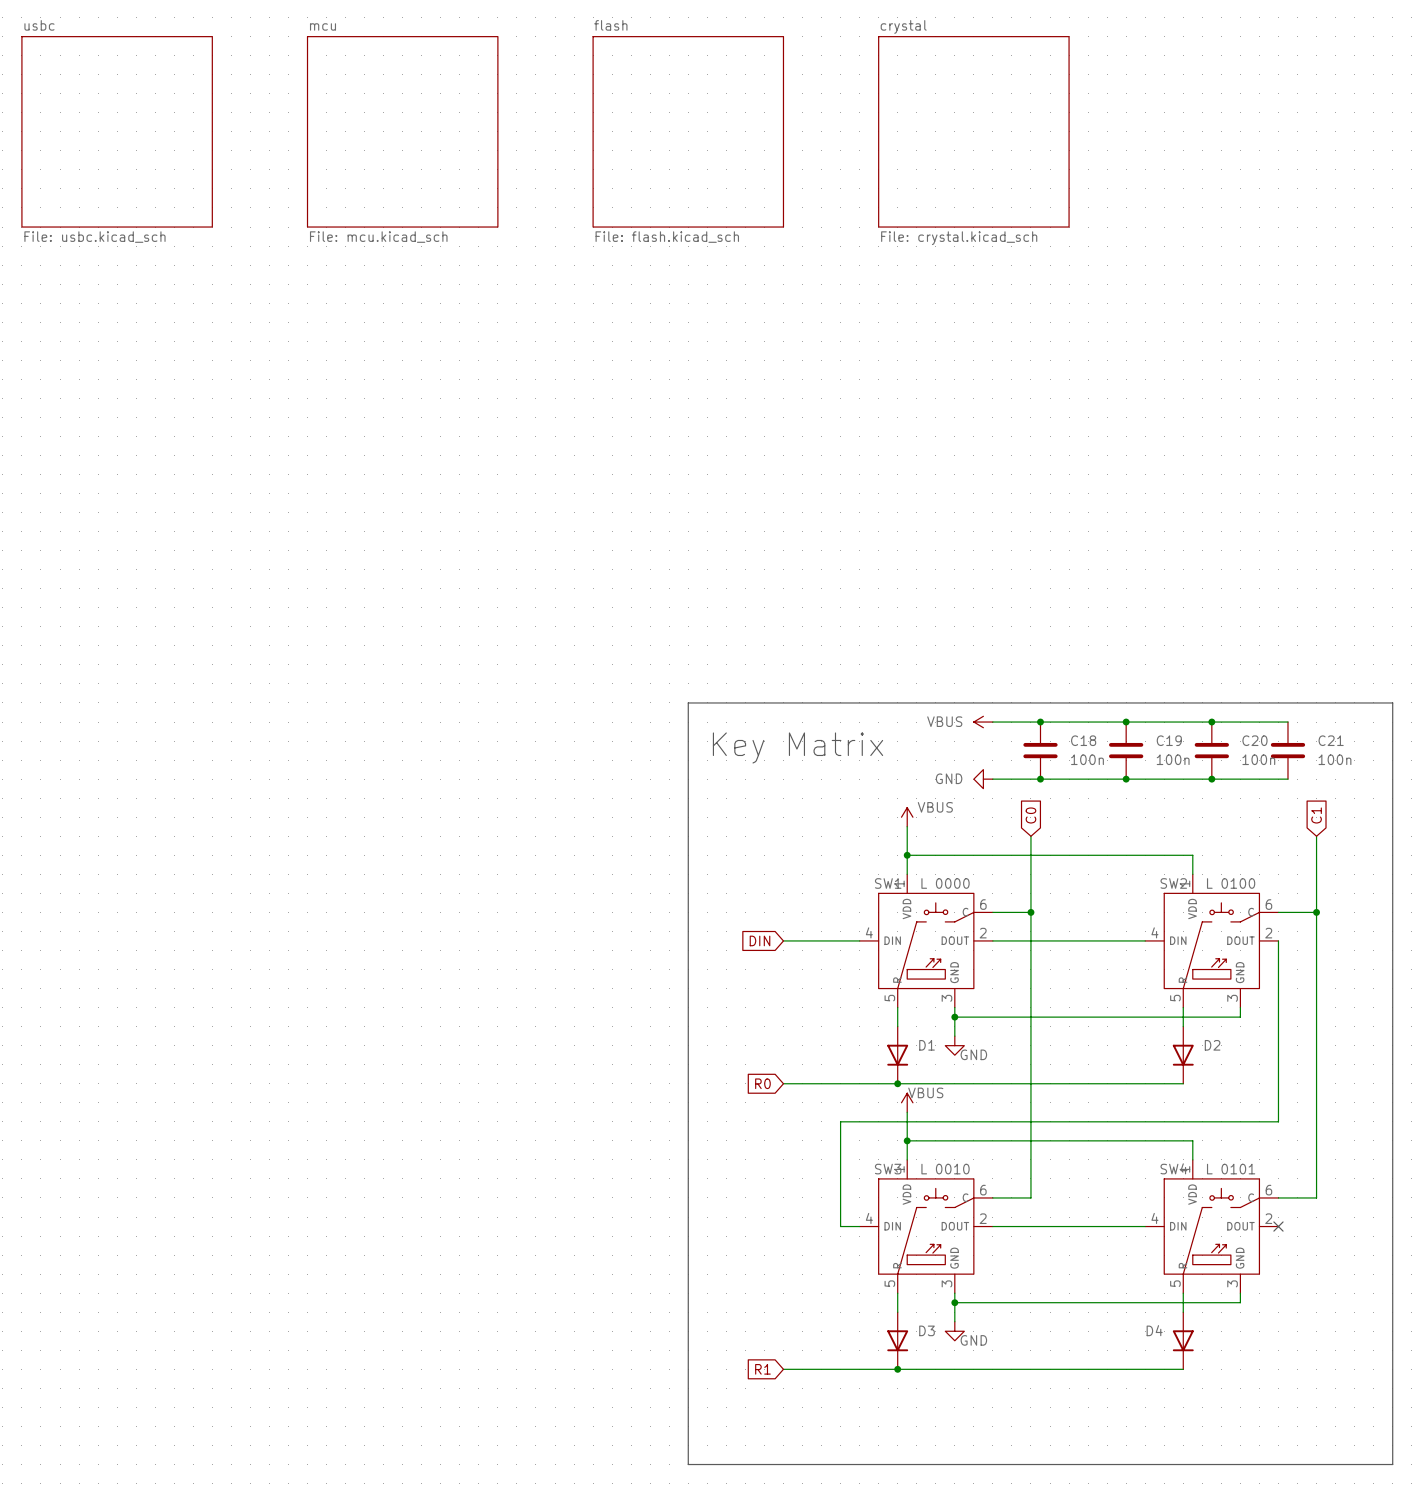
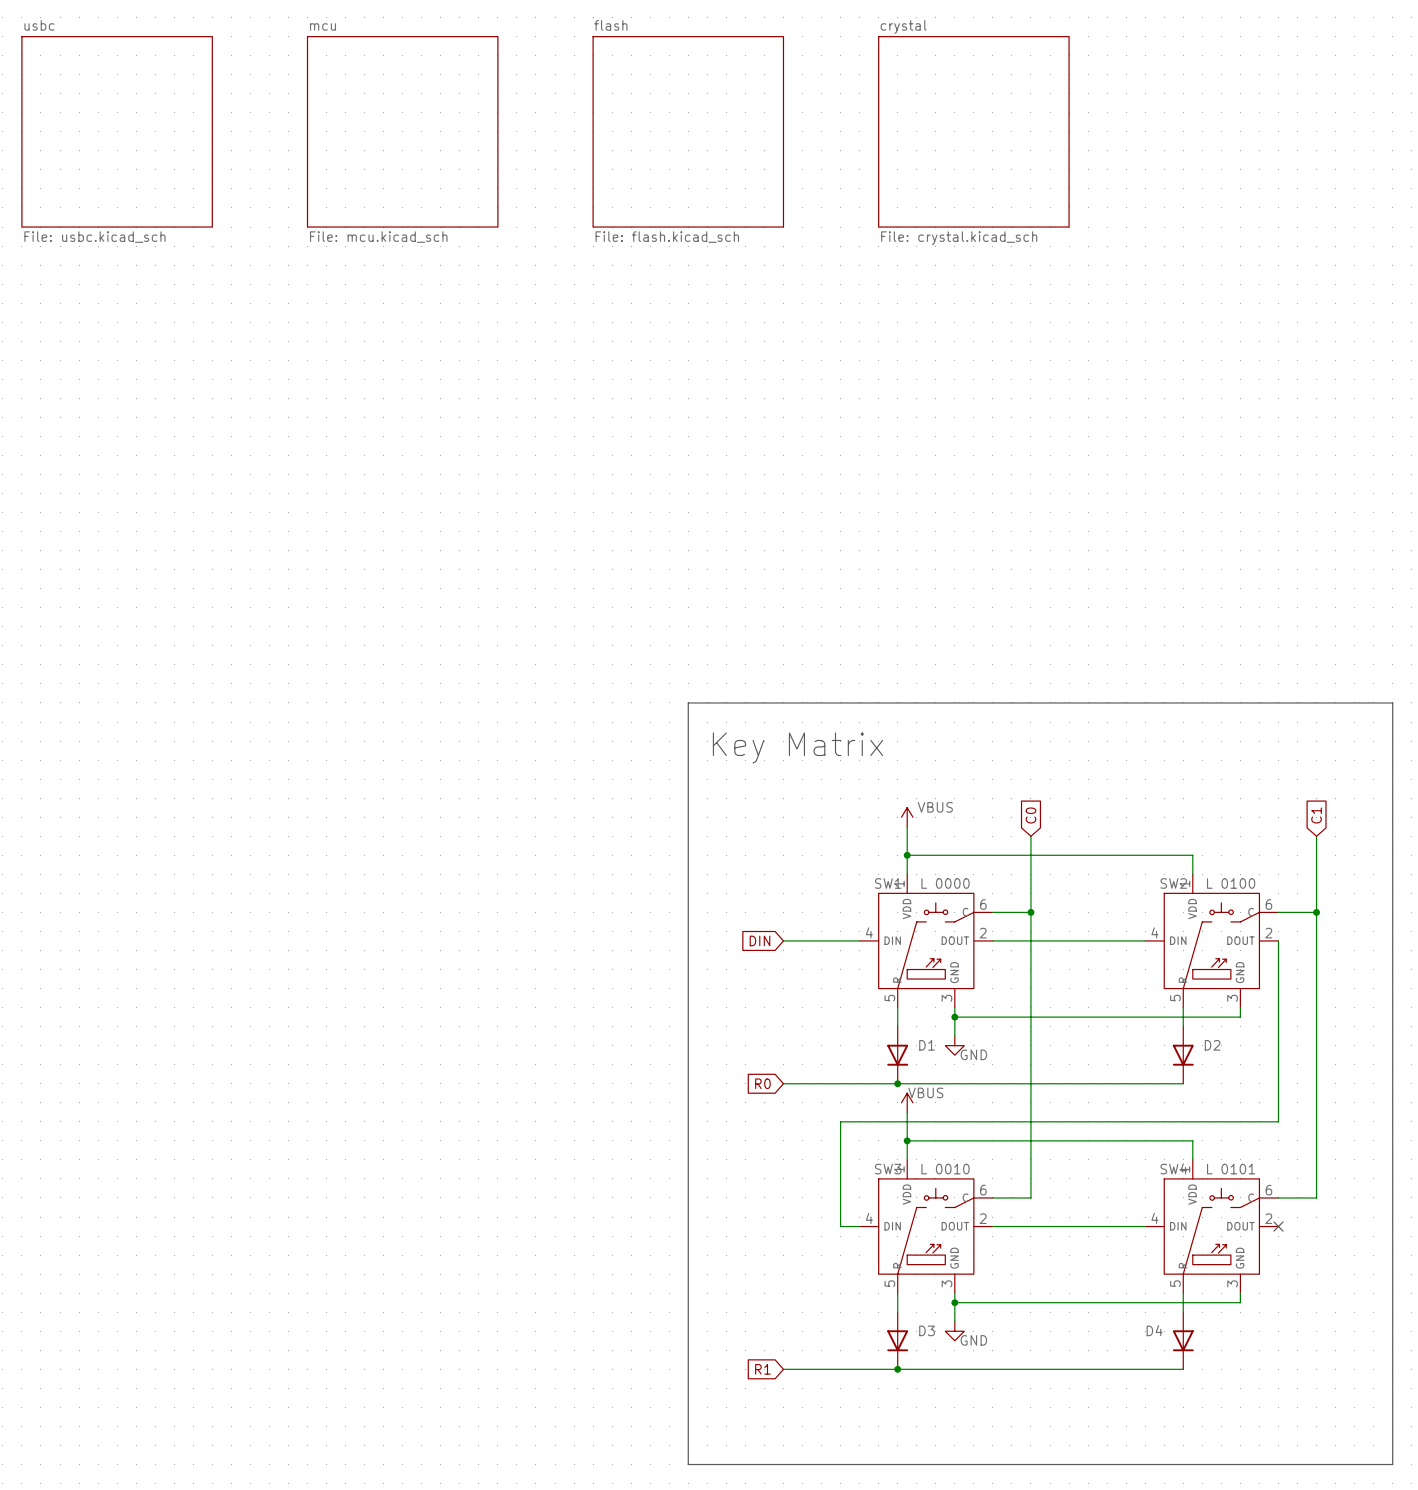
power symbol: VBUS (983, 722) -> none
wire: (992, 722) (1287, 722) -> none
junction: (1040, 722) -> none
junction: (1126, 722) -> none
junction: (1211, 722) -> none
C18: 100n (1040, 750) -> none
C19: 100n (1126, 750) -> none
C20: 100n (1211, 750) -> none
C21: 100n (1287, 750) -> none
power symbol: GND (983, 779) -> none
wire: (992, 779) (1287, 779) -> none
junction: (1040, 779) -> none
junction: (1126, 779) -> none
junction: (1211, 779) -> none

